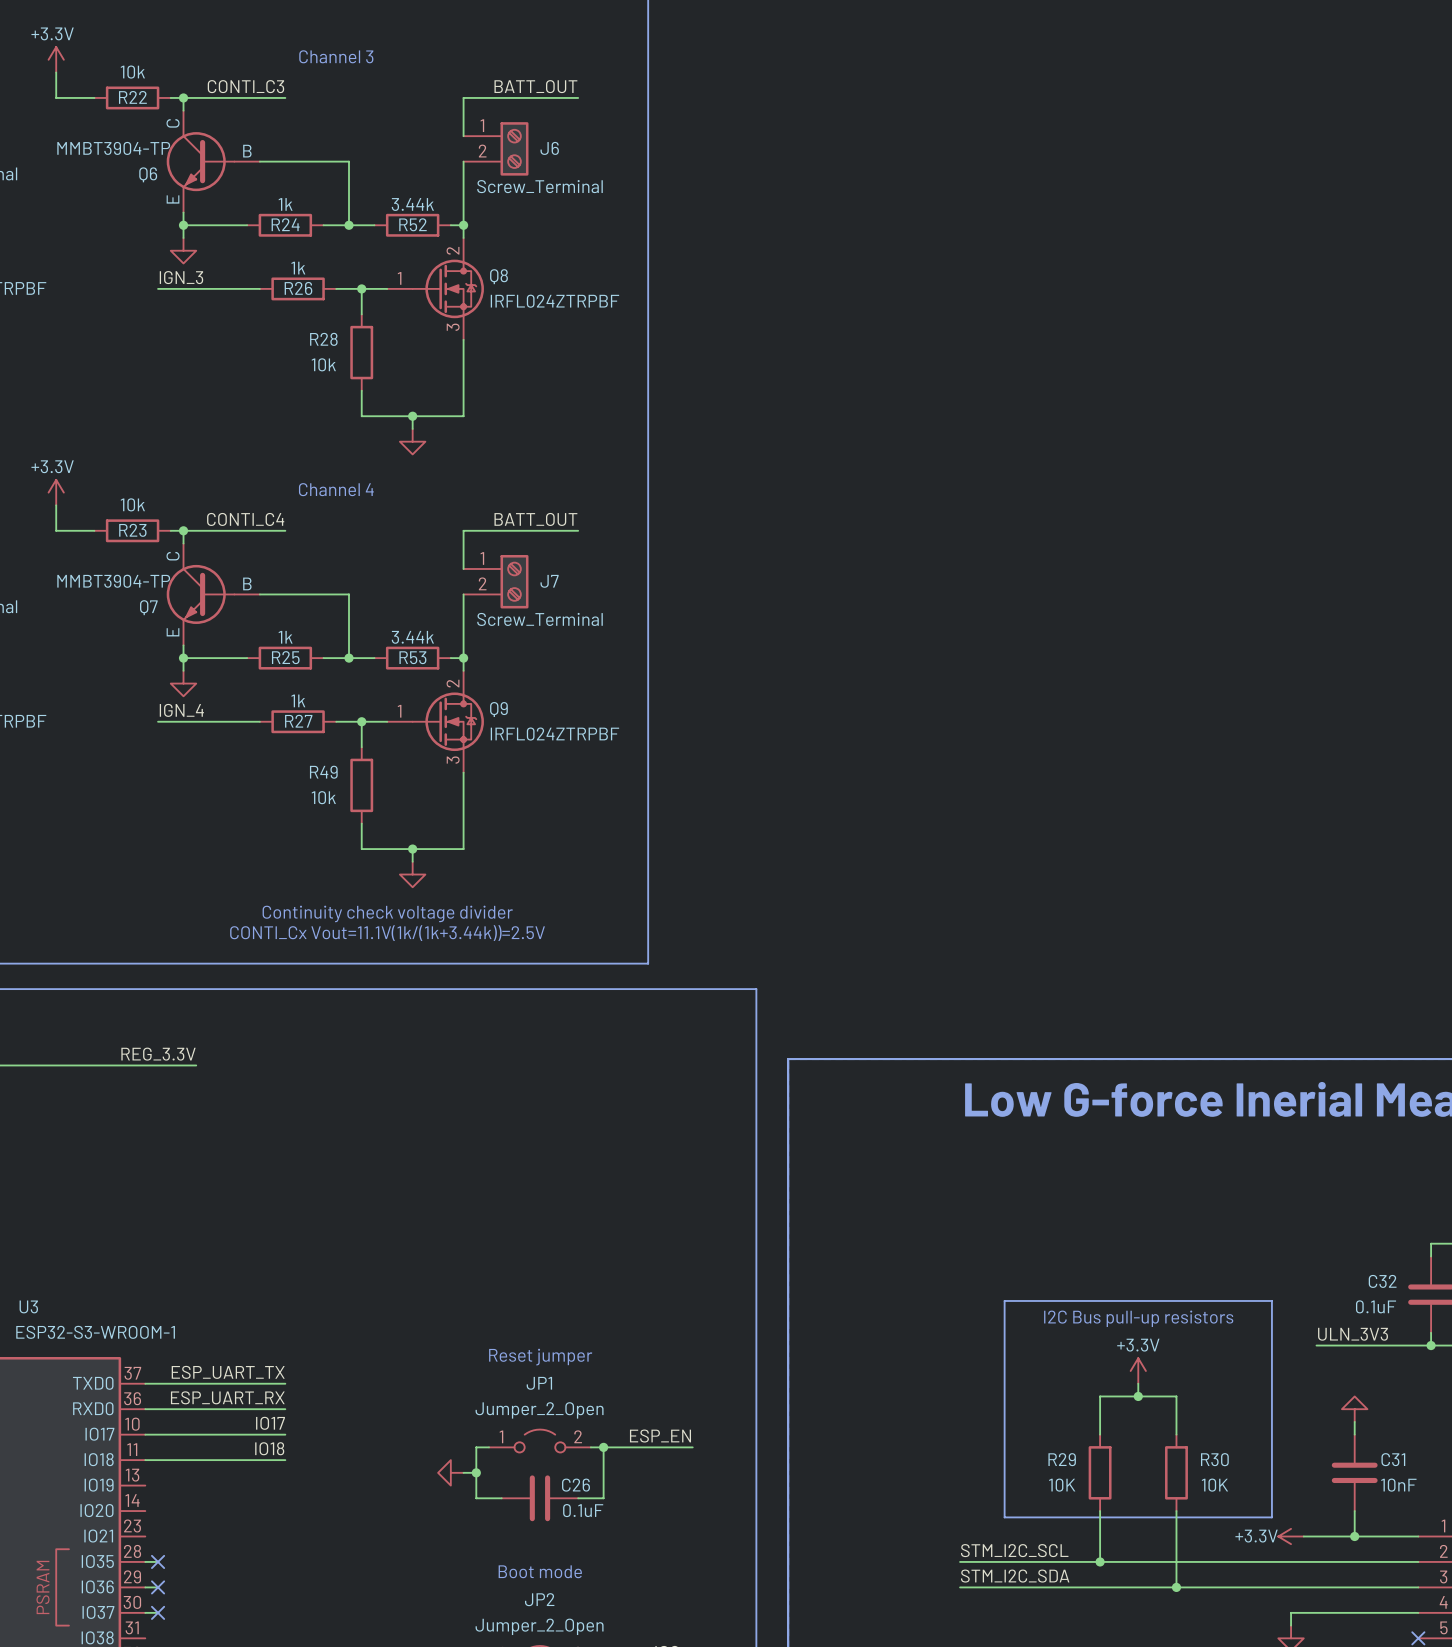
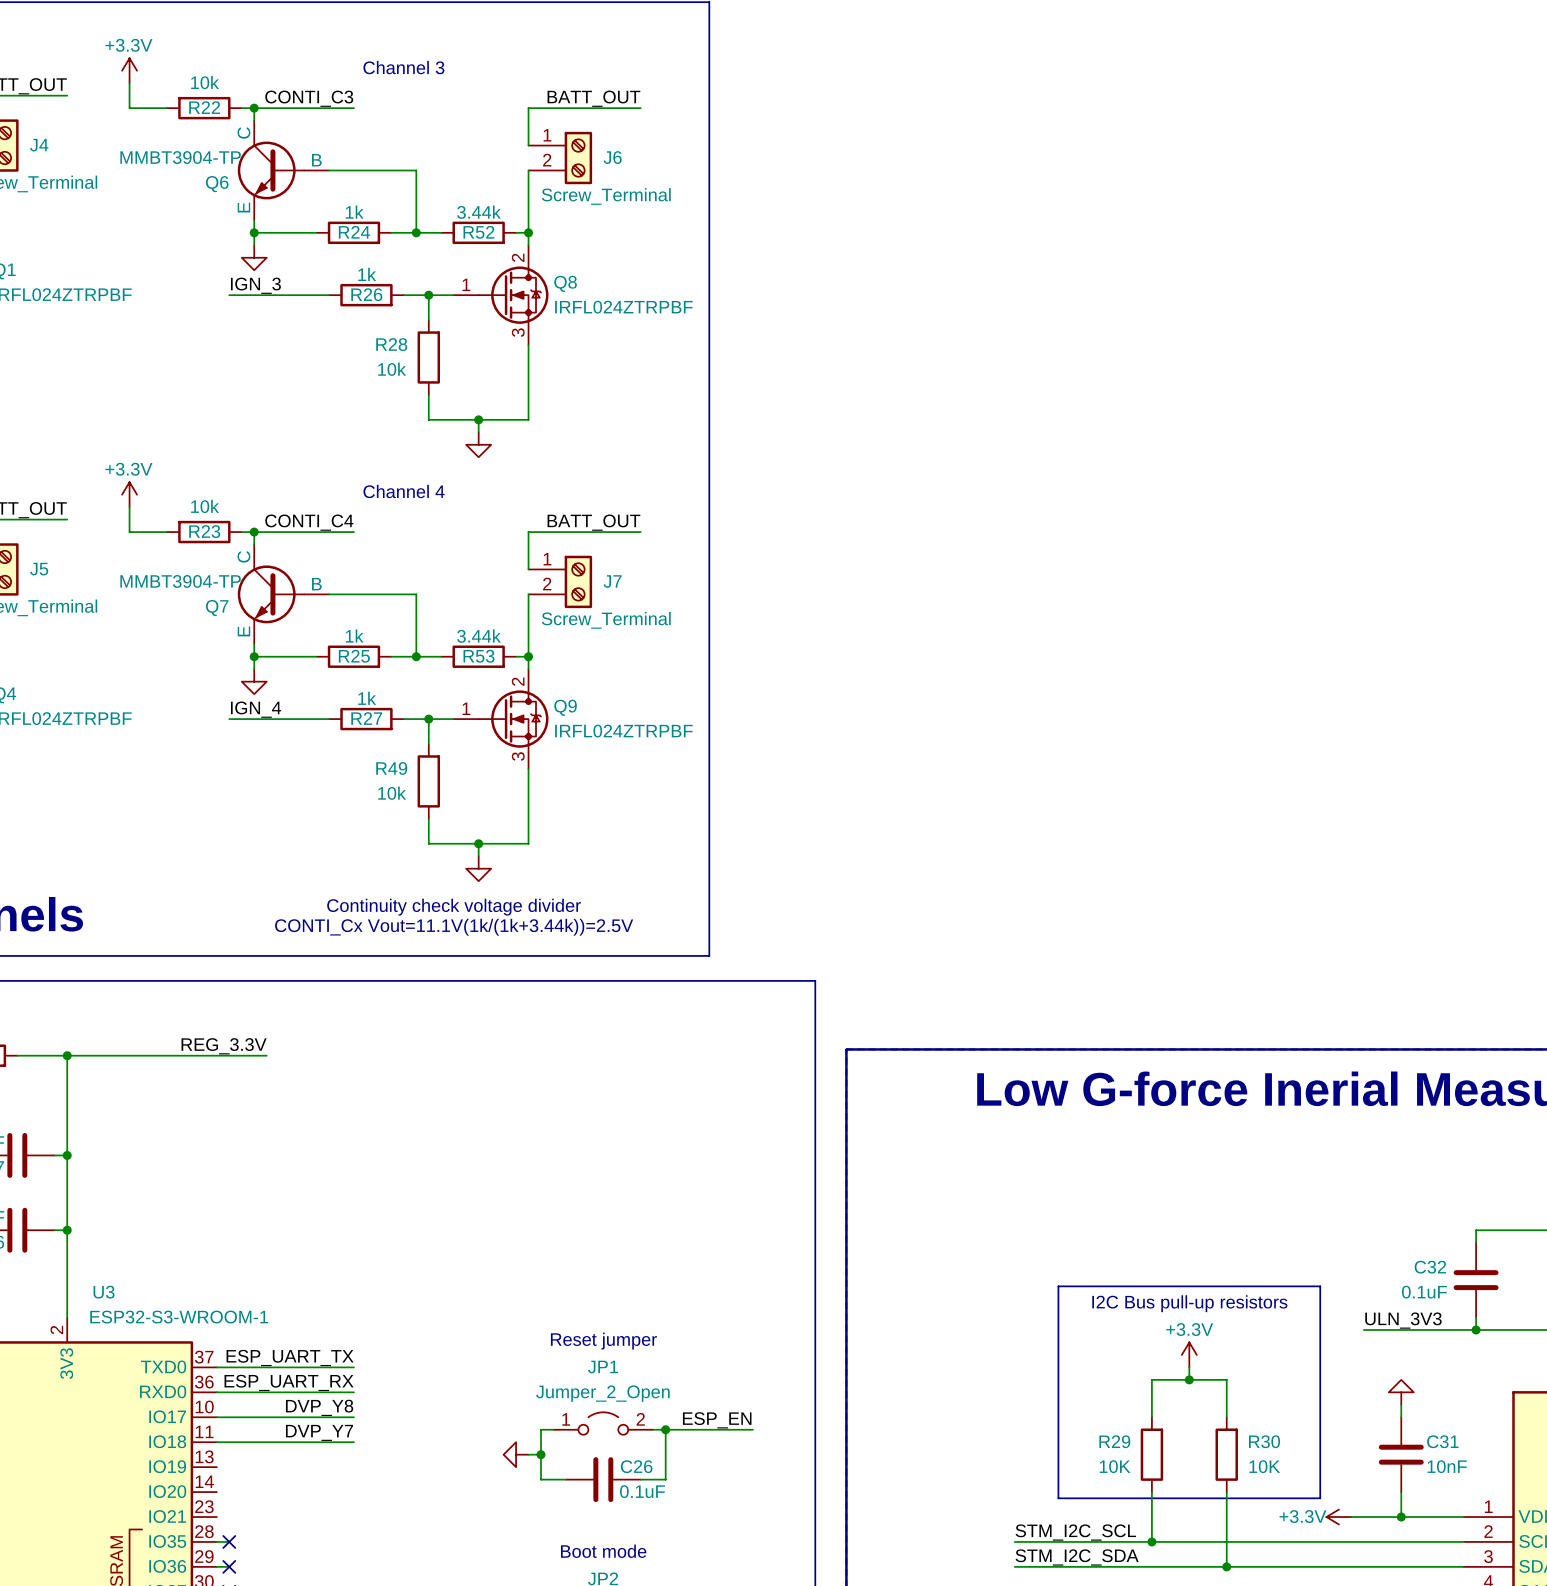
label: IO17 (270, 1423) -> DVP_Y8 (319, 1407)
label: IO18 (269, 1448) -> DVP_Y7 (319, 1432)

